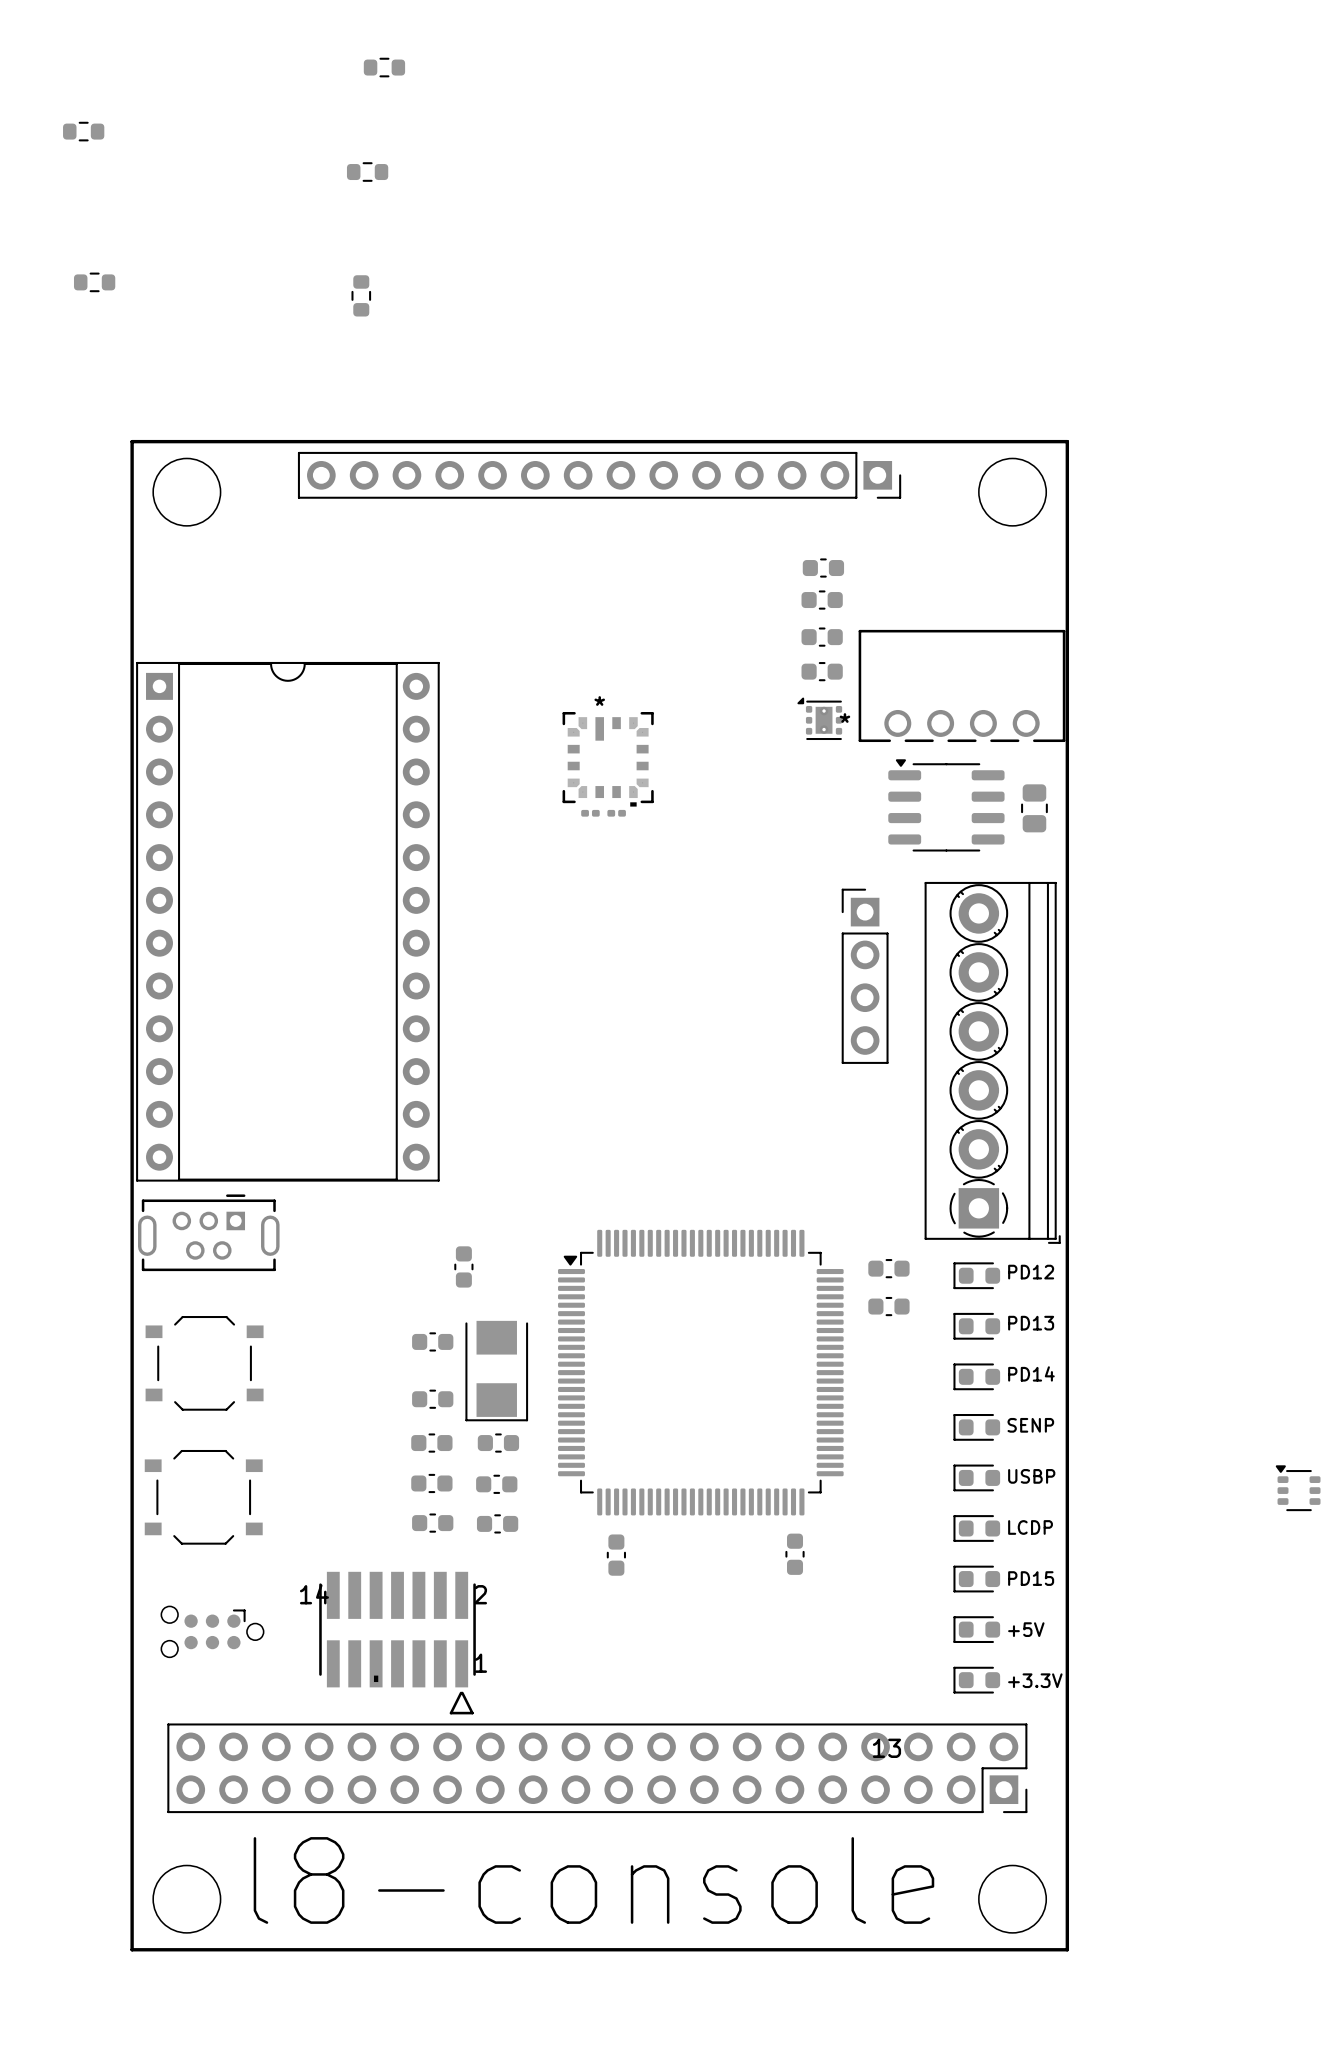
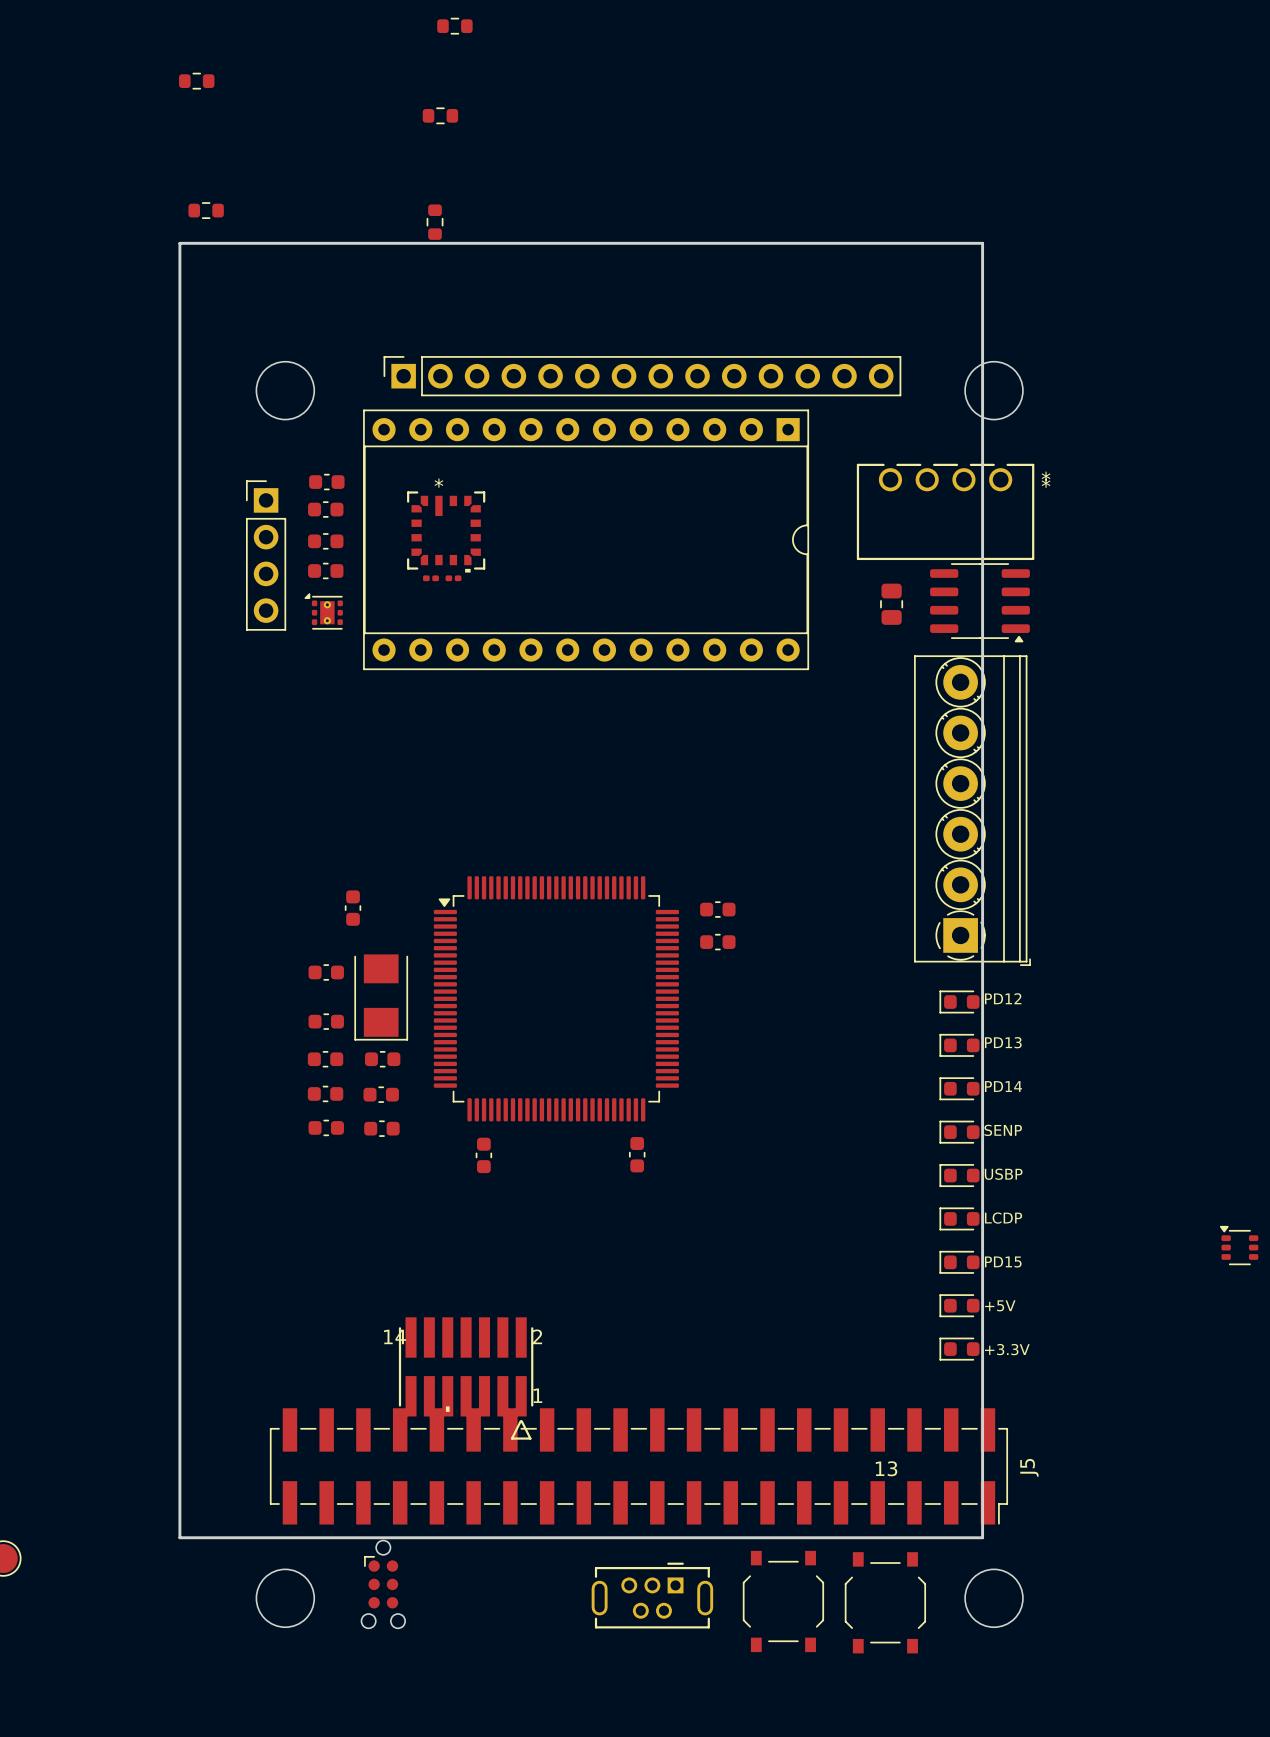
board edge: (132, 441) (1067, 441) (1067, 1949) (132, 1949) (132, 441) -> (179, 243) (982, 243) (982, 1537) (179, 1537) (179, 243)
part rotation: 0° (599, 475) -> 180° (642, 376)
part: (823, 568) -> none
part: none -> (326, 482)
part: (822, 600) -> none
part: none -> (325, 509)
part: (822, 637) -> none
part: none -> (325, 541)
part: (822, 671) -> none
part: none -> (266, 555)
part rotation: 0° (962, 685) -> 180° (945, 511)
part: none -> (325, 570)
part: none -> (430, 578)
part: none -> (453, 578)
part: (819, 718) -> none
part: none -> (323, 611)
part position: (608, 759) -> (446, 531)
part rotation: 0° (946, 805) -> 180° (979, 602)
part position: (946, 805) -> (979, 602)
part position: (1034, 808) -> (891, 604)
part: (590, 813) -> none
part: (616, 813) -> none
part rotation: 0° (287, 921) -> 90° clockwise (586, 539)
part position: (287, 921) -> (586, 539)
part: (865, 976) -> none
part position: (992, 1062) -> (972, 810)
part: none -> (353, 908)
part: none -> (717, 909)
part: none -> (717, 942)
part: none -> (326, 972)
part: none -> (959, 1001)
part: none -> (326, 1021)
part: (208, 1232) -> none
part: none -> (959, 1045)
part: (463, 1266) -> none
part: (888, 1268) -> none
part: none -> (325, 1059)
part: none -> (382, 1059)
text position: PD12 (1031, 1272) -> PD12 (1003, 998)
part: (976, 1275) -> none
part: none -> (959, 1088)
part: (888, 1306) -> none
part: none -> (325, 1093)
part: none -> (381, 1094)
text position: PD13 (1031, 1323) -> PD13 (1003, 1042)
part: (976, 1326) -> none
part: (432, 1341) -> none
part: none -> (326, 1127)
part: none -> (381, 1128)
part: none -> (959, 1132)
part: (204, 1363) -> none
part position: (496, 1371) -> (381, 997)
part position: (700, 1372) -> (556, 998)
text position: PD14 (1031, 1373) -> PD14 (1003, 1086)
part: (976, 1376) -> none
part: none -> (637, 1154)
part rotation: 0° (432, 1399) -> 90° clockwise (483, 1155)
part: none -> (959, 1175)
text position: SENP (1030, 1425) -> SENP (1003, 1130)
part: (976, 1427) -> none
part: (431, 1443) -> none
part: (498, 1443) -> none
part: none -> (959, 1218)
text position: USBP (1031, 1476) -> USBP (1003, 1174)
part: (976, 1477) -> none
part: (431, 1483) -> none
part: (496, 1484) -> none
part: (203, 1497) -> none
part: none -> (959, 1262)
part: (432, 1523) -> none
part: (497, 1523) -> none
text position: LCDP (1030, 1527) -> LCDP (1003, 1218)
part: (976, 1528) -> none
part: (795, 1554) -> none
part: (616, 1555) -> none
part: none -> (959, 1305)
text position: PD15 (1031, 1578) -> PD15 (1003, 1262)
part: (976, 1579) -> none
part: none -> (959, 1349)
part: (976, 1629) -> none
text position: +5V (1026, 1629) -> +5V (1000, 1305)
part rotation: 0° (212, 1631) -> 90° counterclockwise (383, 1584)
part position: (212, 1631) -> (383, 1584)
part: (976, 1680) -> none
text position: +3.3V (1035, 1680) -> +3.3V (1007, 1349)
J5: none -> (638, 1466)
part: (597, 1768) -> none
text: l8-console (593, 1880) -> none
part: none -> (652, 1595)
part: none -> (783, 1601)
part: none -> (885, 1602)

